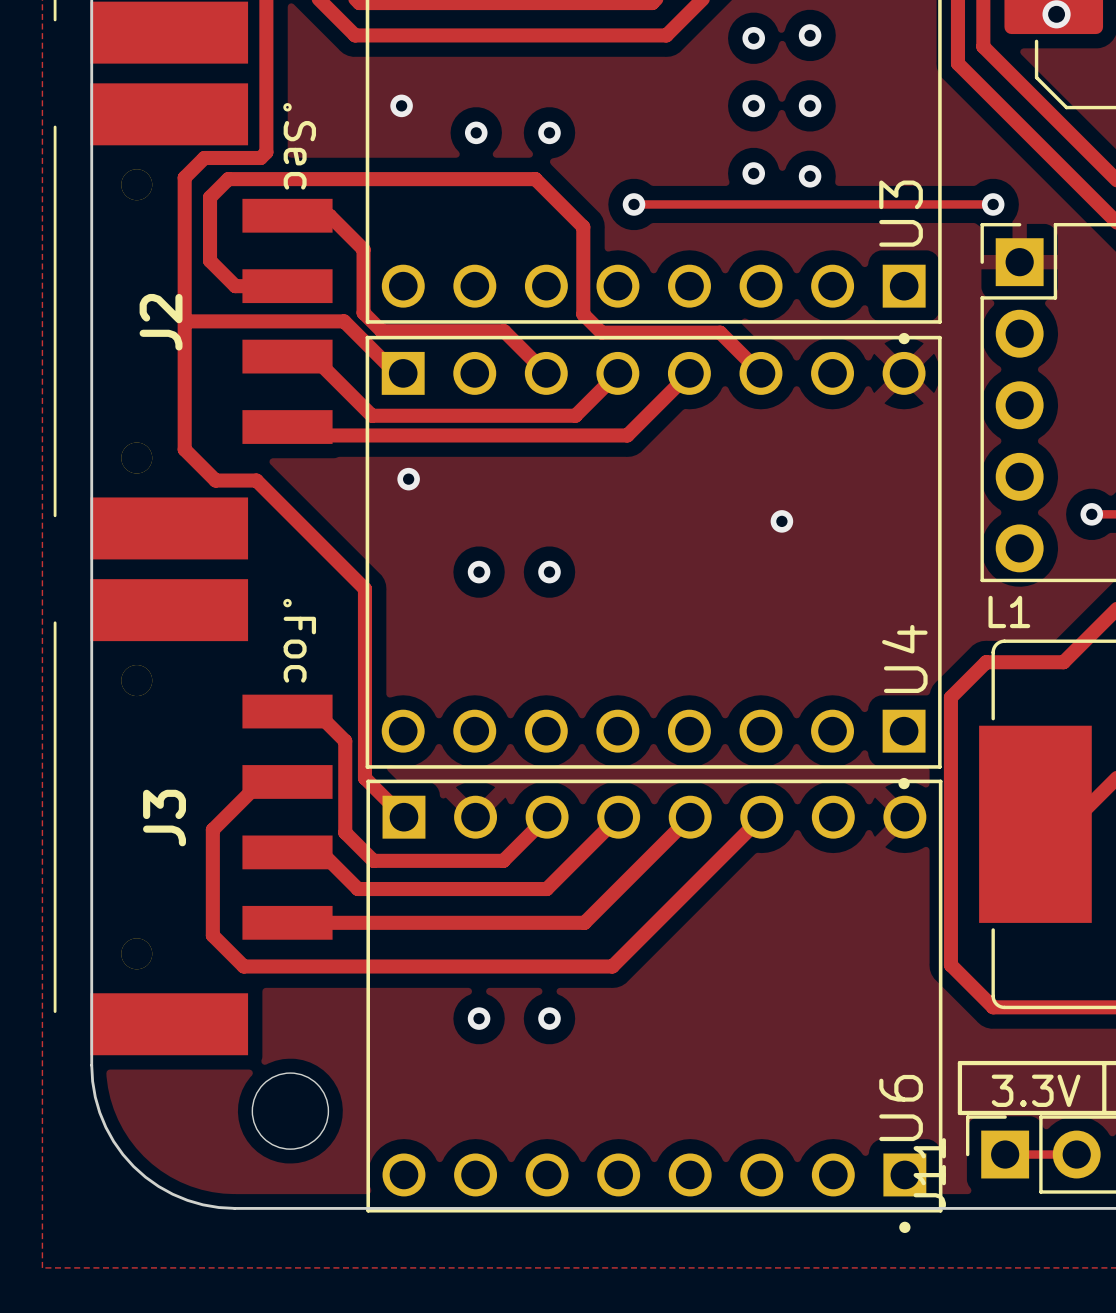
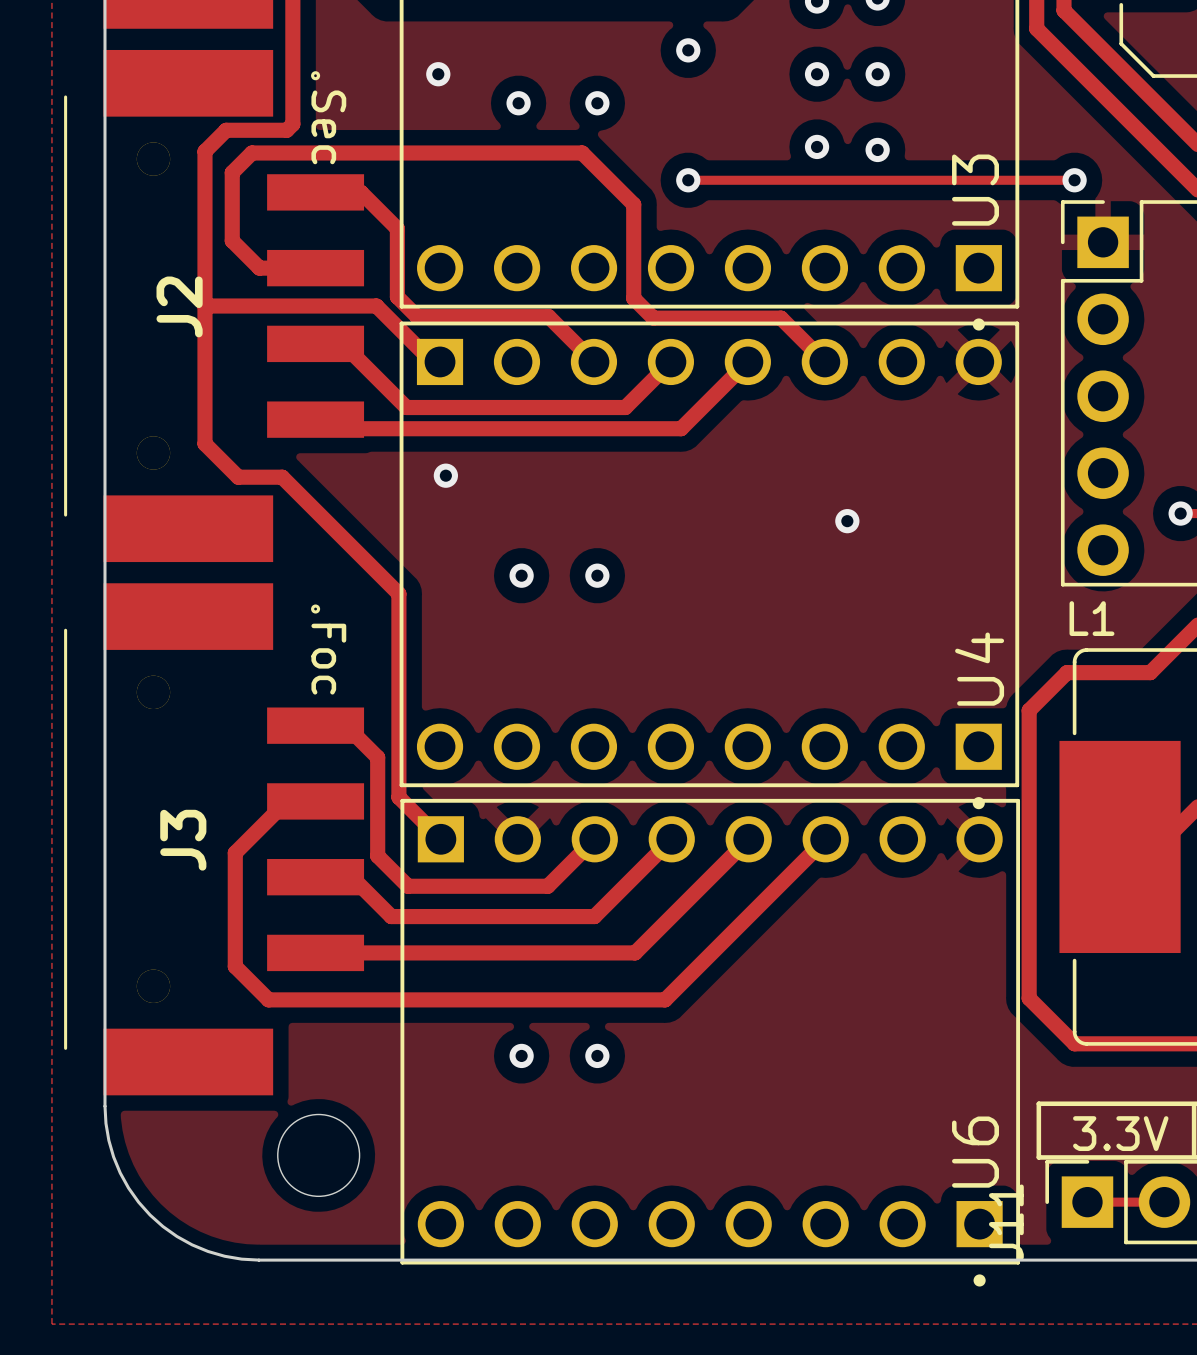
via: none -> (688, 50)

